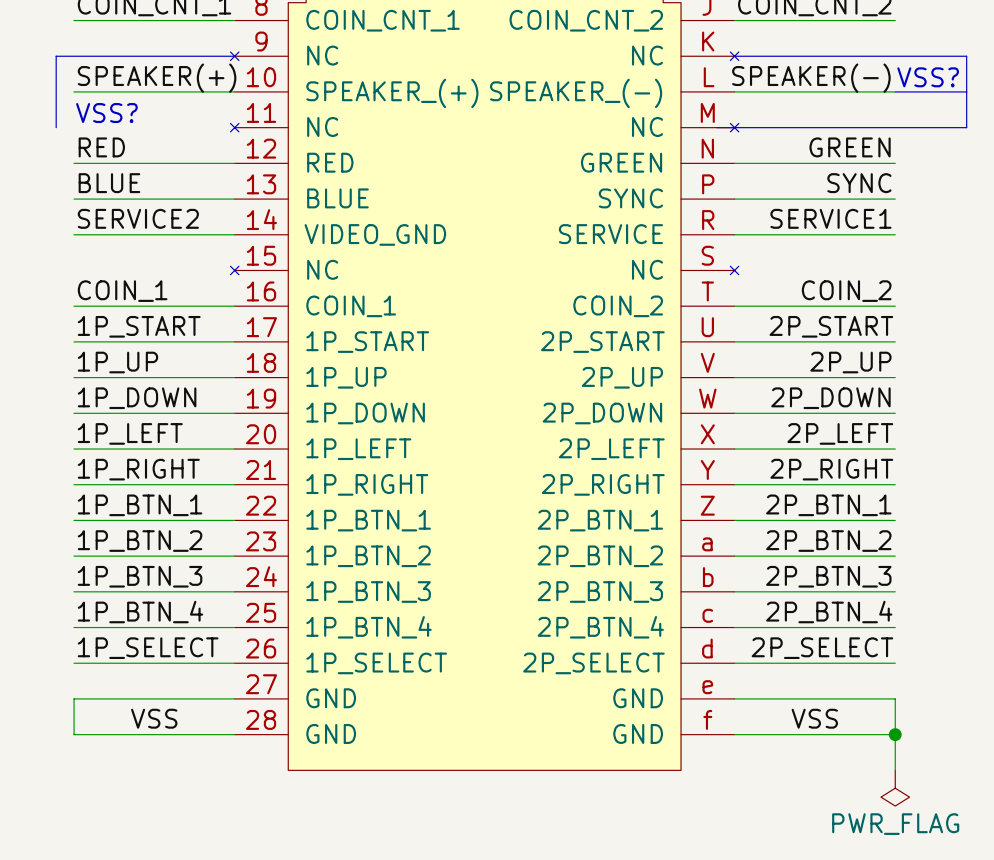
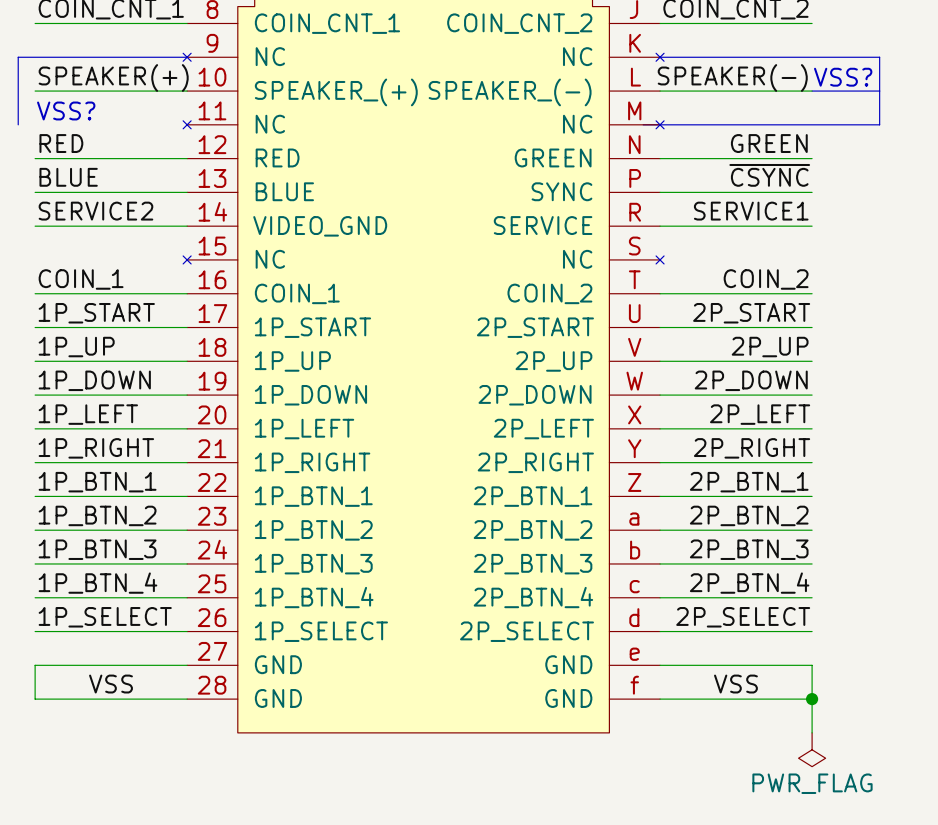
label: SYNC (859, 183) -> ~{CSYNC} (769, 175)

